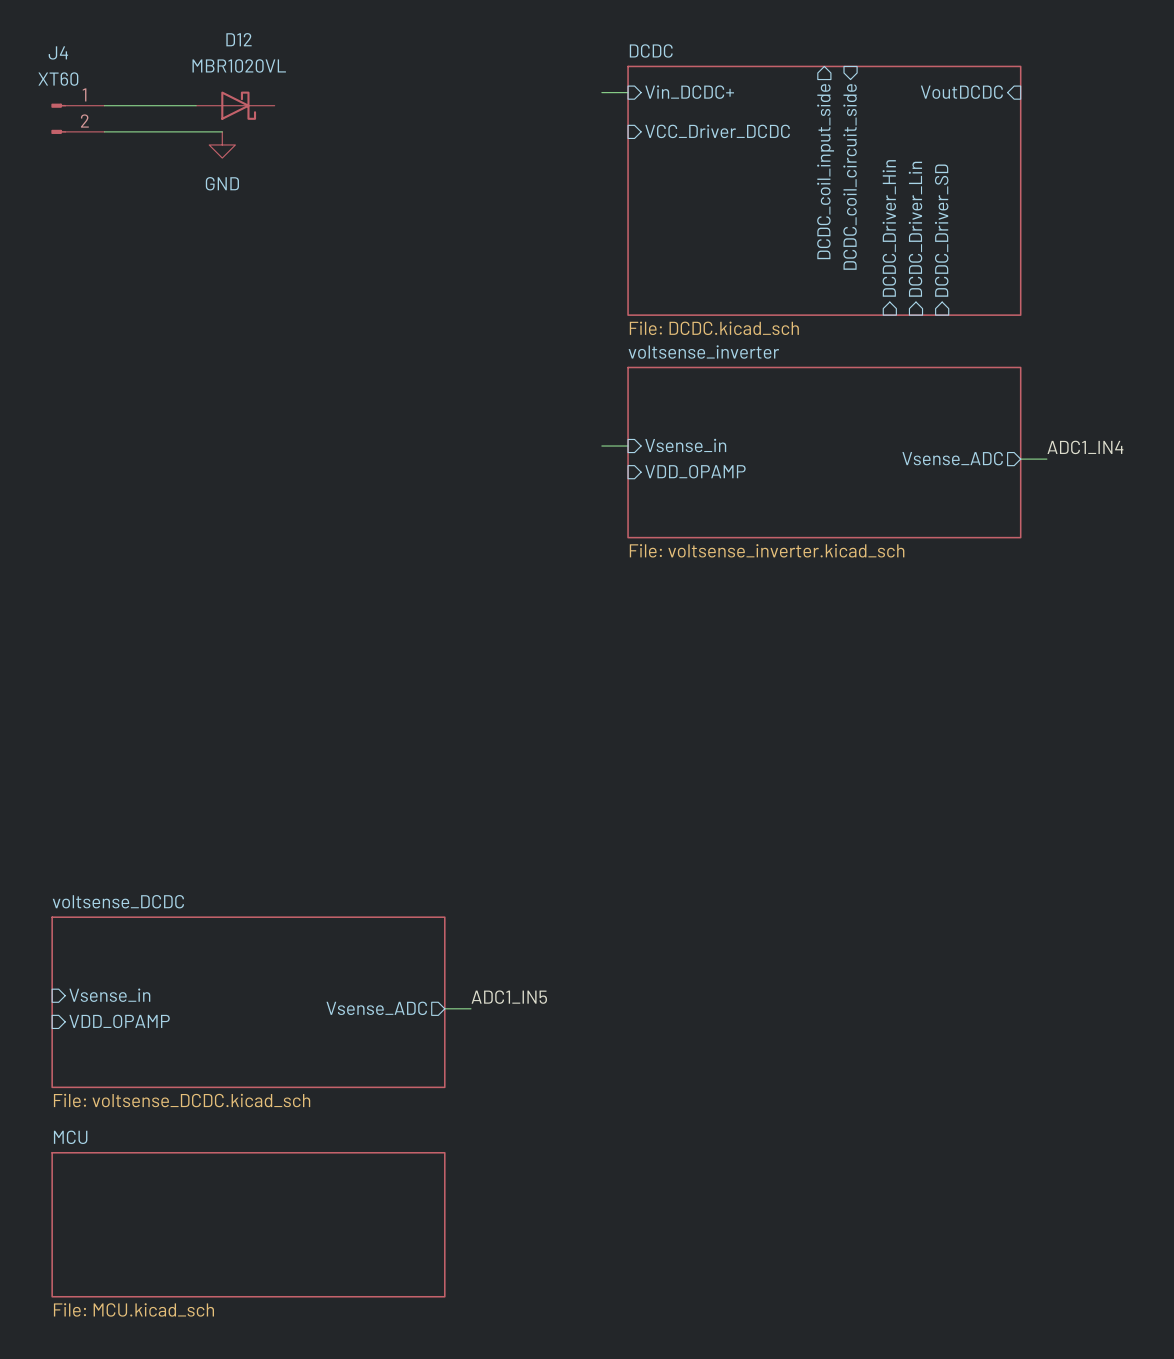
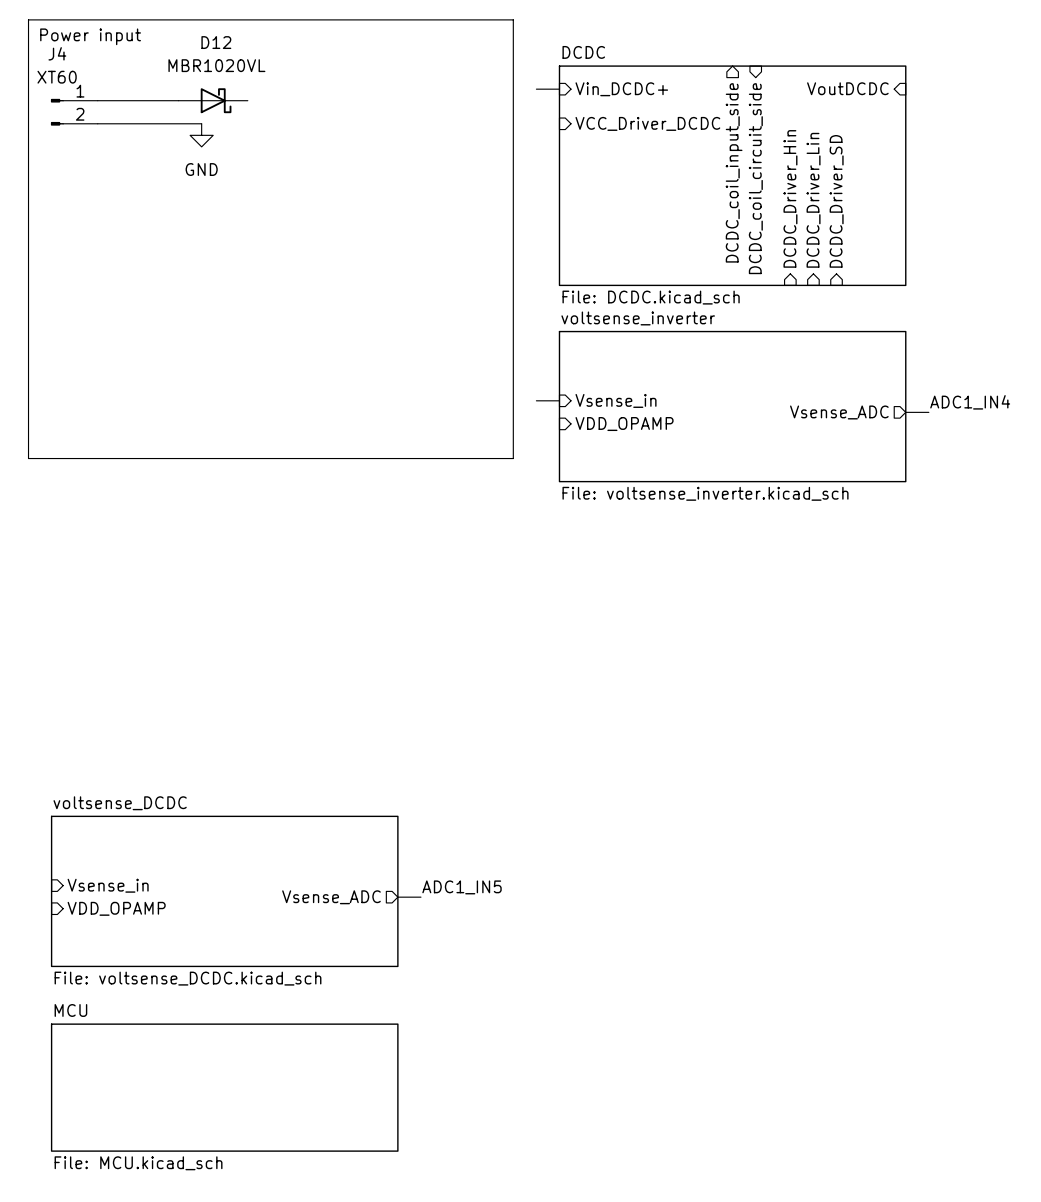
line: none -> (28, 19) (513, 19) (513, 458) (28, 458) (28, 19)
text: none -> Power input (90, 36)

